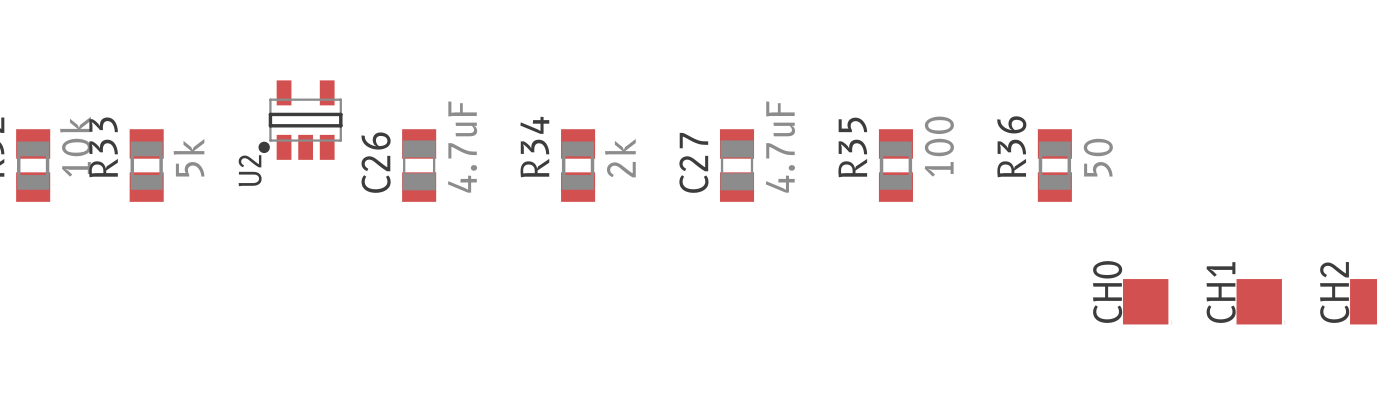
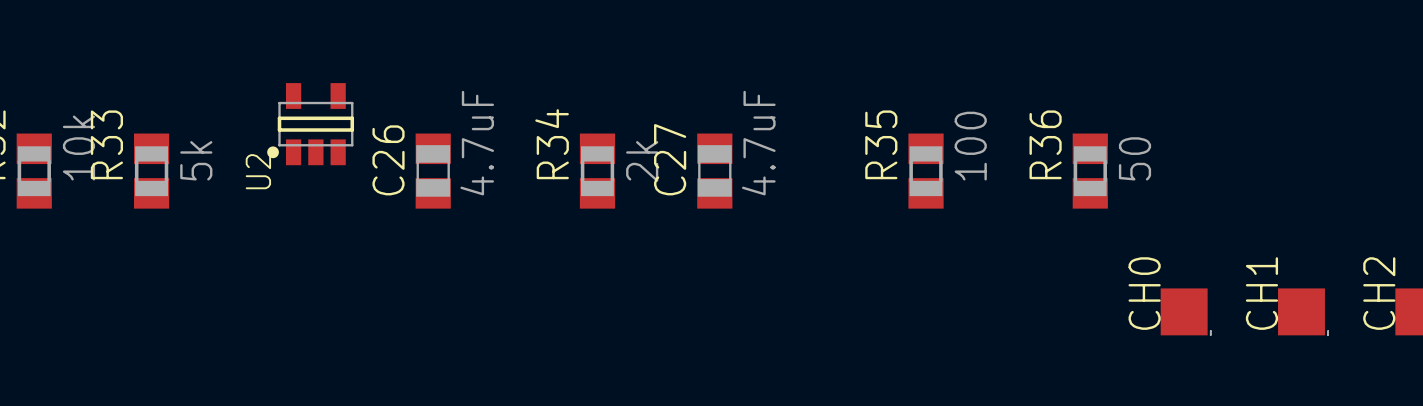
C27 position: (737, 165) -> (714, 171)

